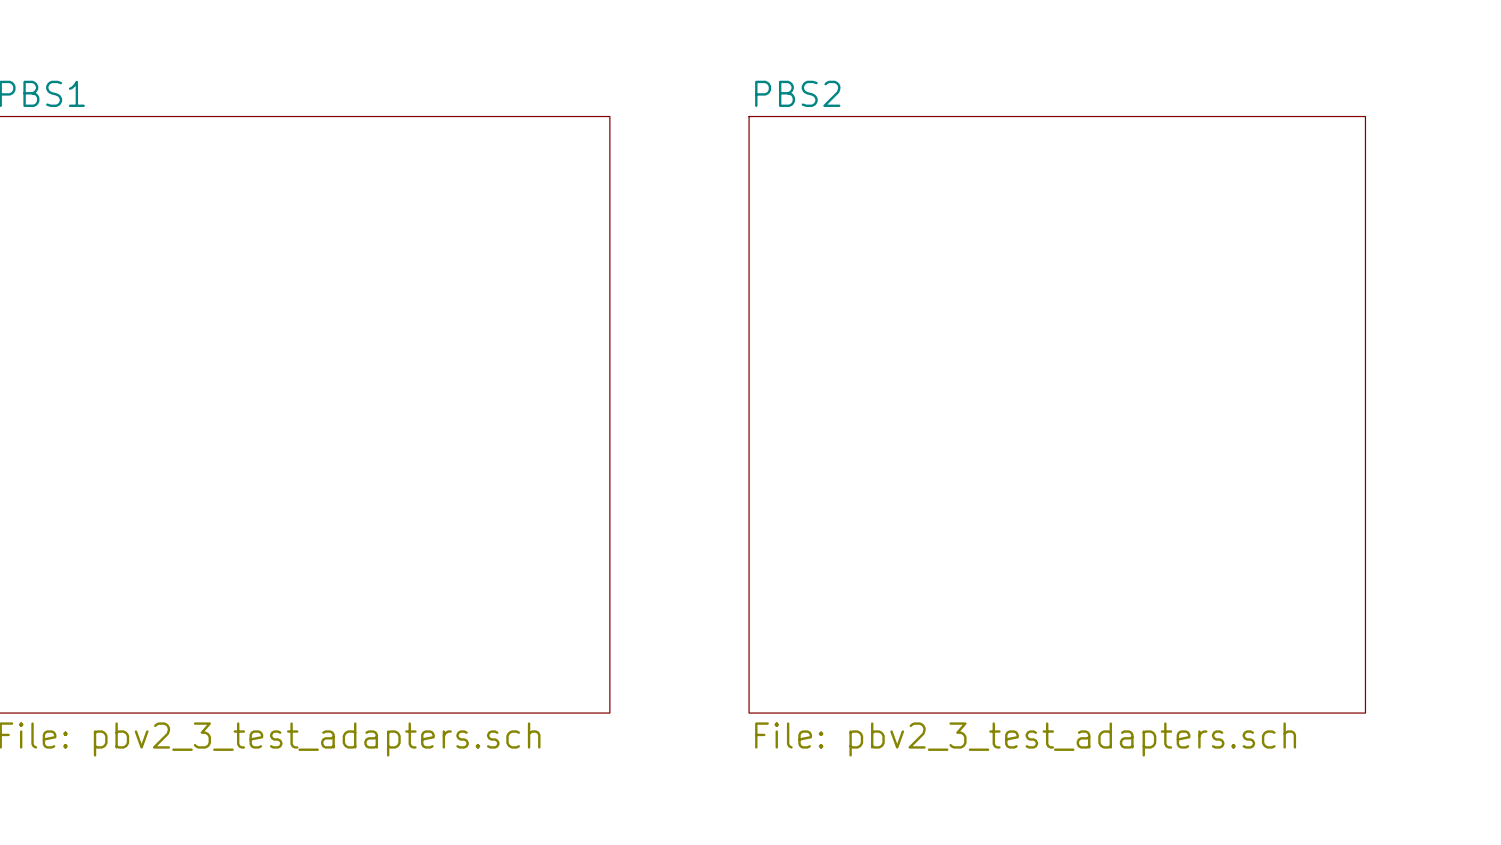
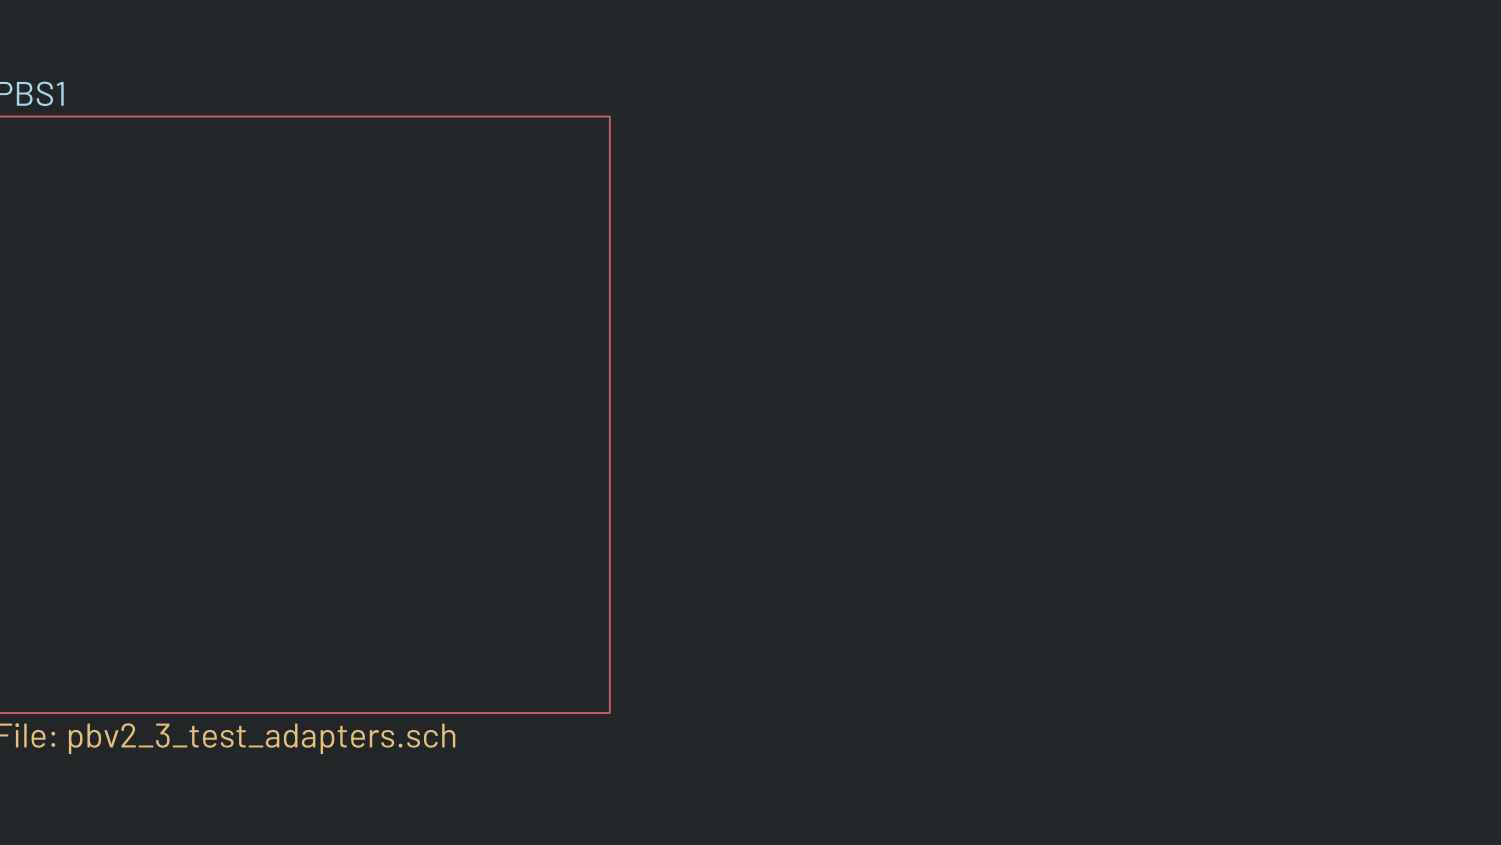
sheet PBS2: File: pbv2_3_test_adapters.sch (1057, 414) -> none

